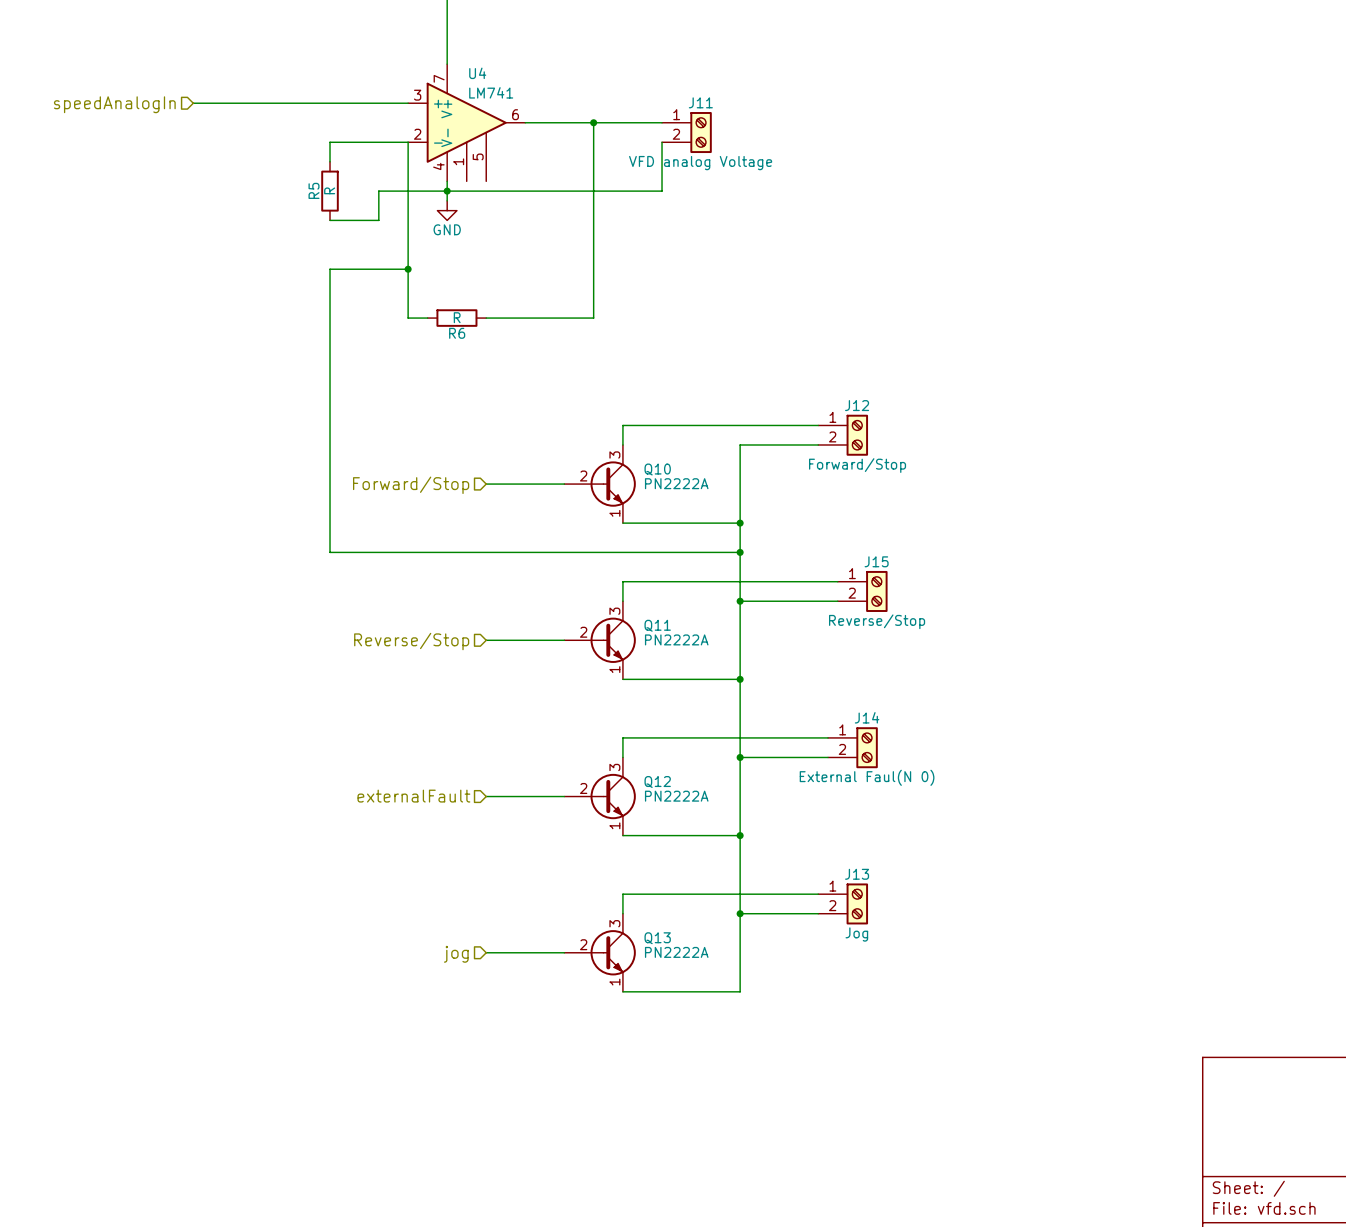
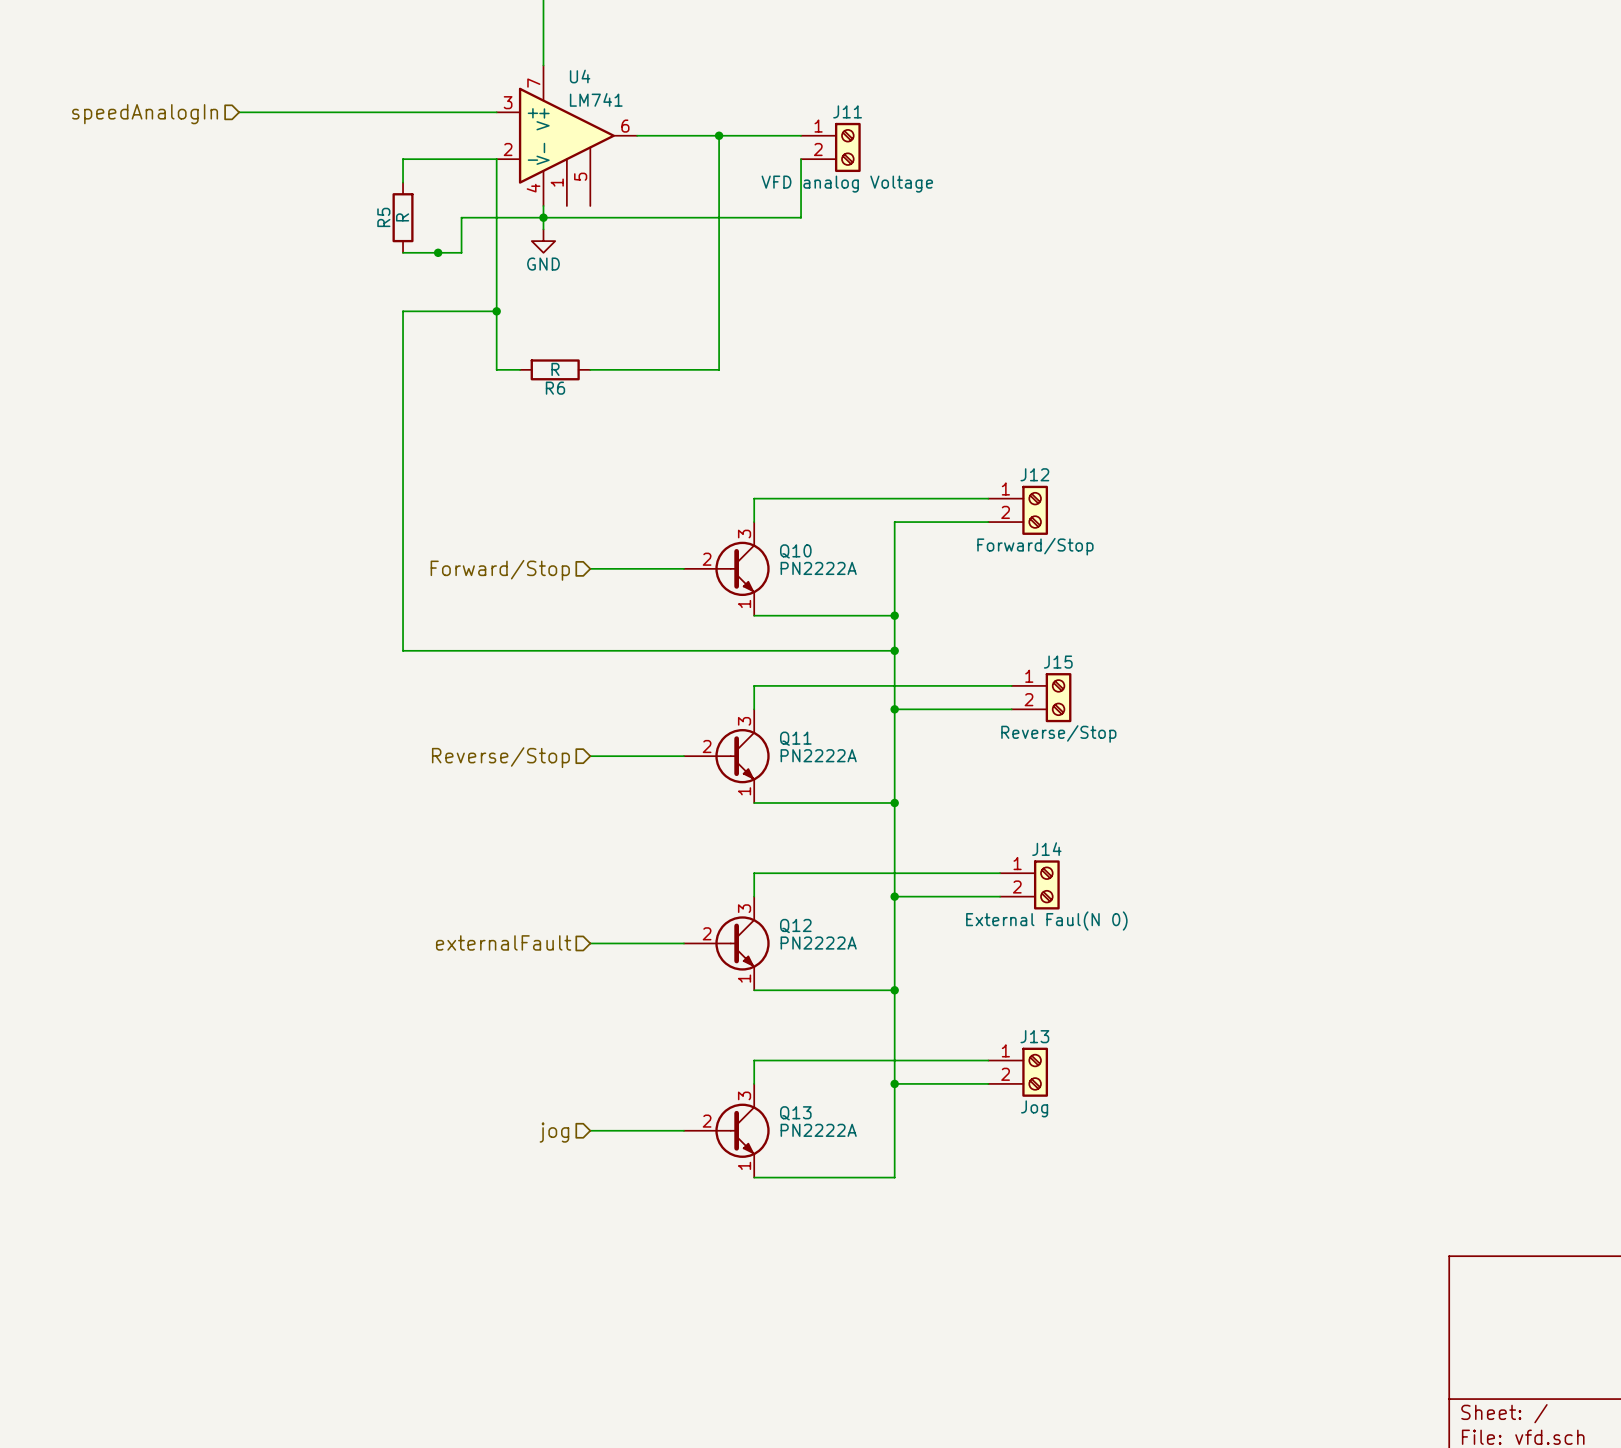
junction: none -> (438, 252)

